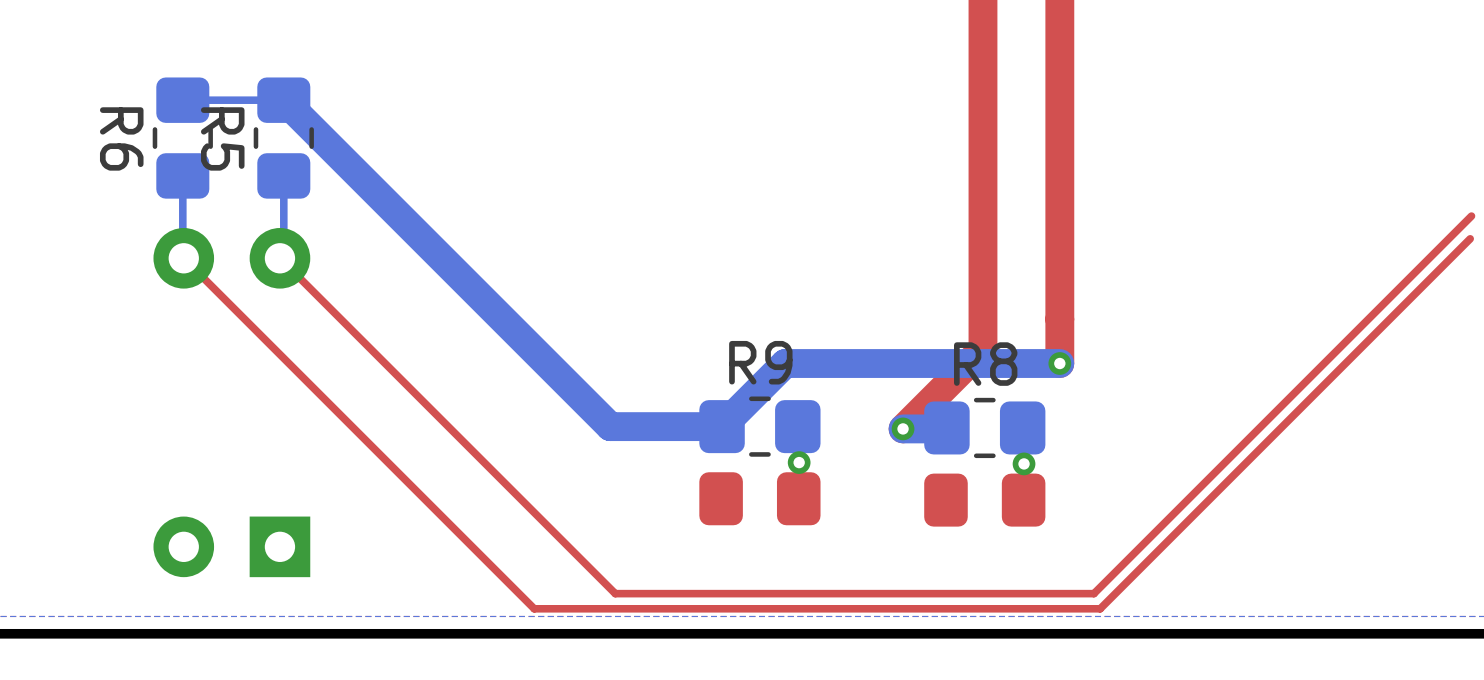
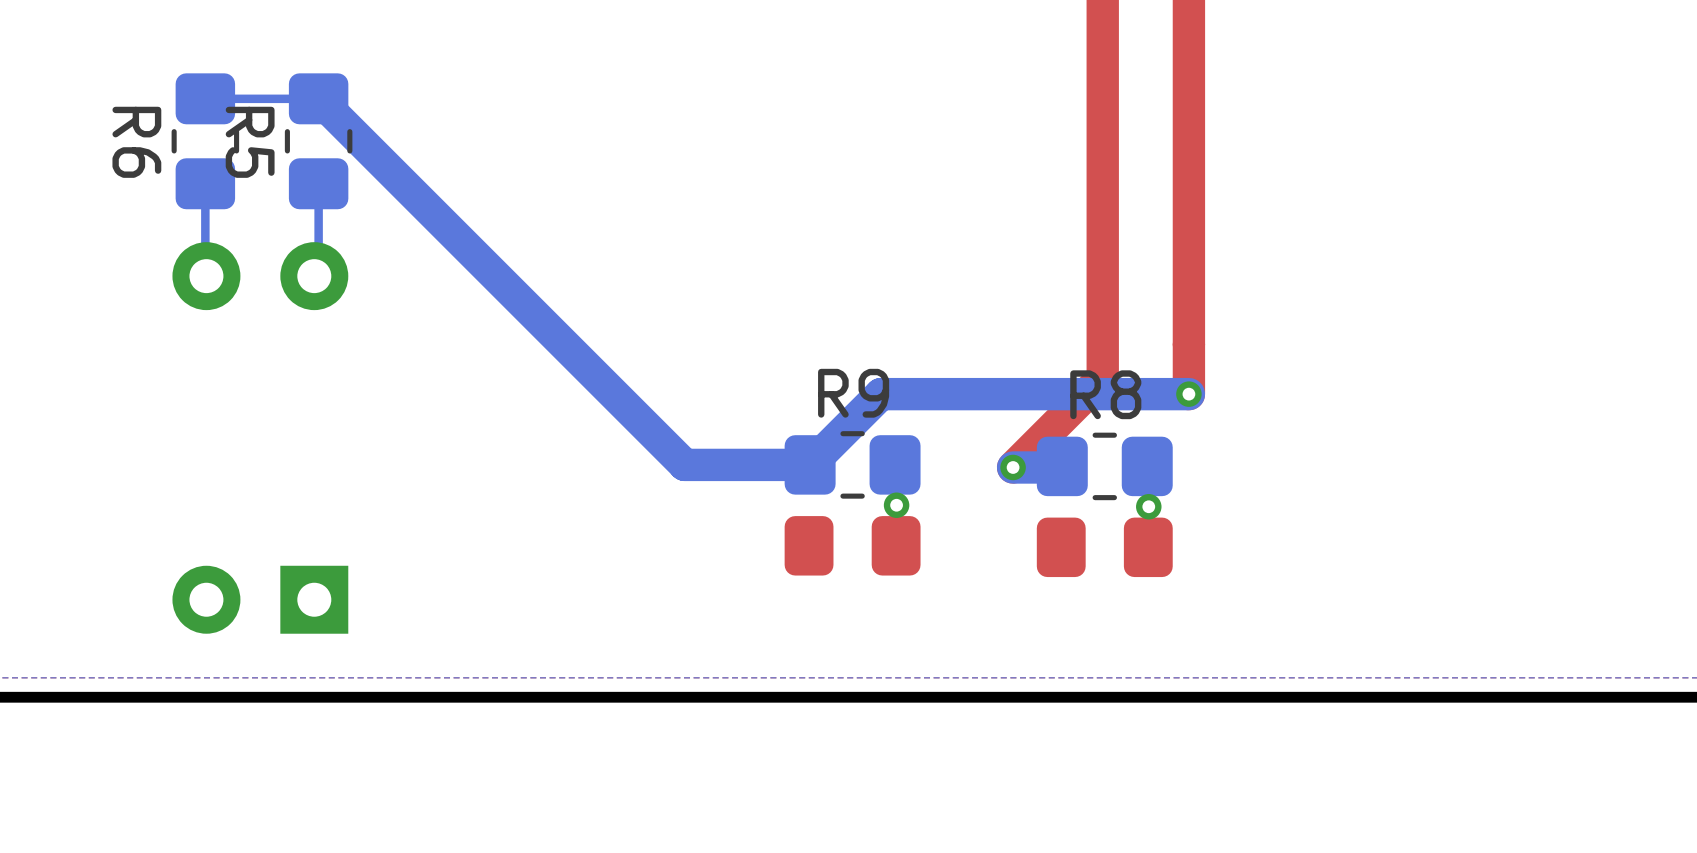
top track: (1471, 216) (1093, 593) (615, 593) (279, 258) -> none
top track: (1470, 238) (1100, 608) (534, 608) (183, 258) -> none

